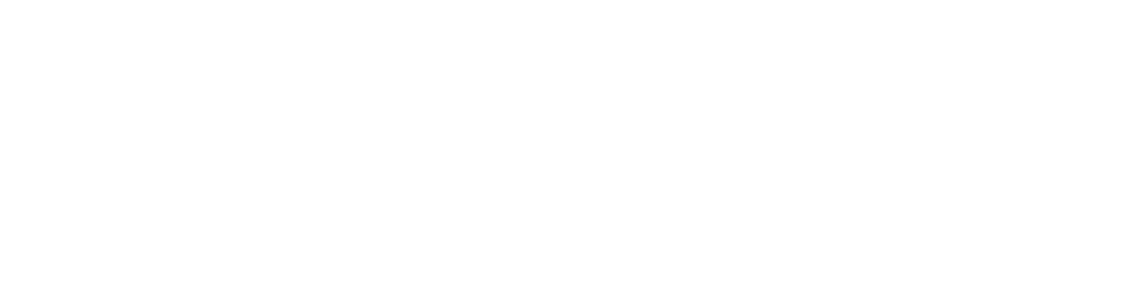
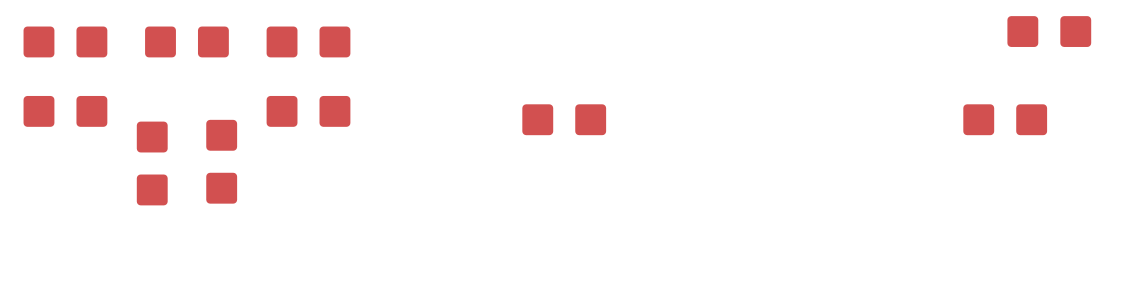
part: none -> (1049, 31)
part: none -> (65, 41)
part: none -> (186, 41)
part: none -> (308, 41)
part: none -> (65, 111)
part: none -> (308, 111)
part: none -> (564, 119)
part: none -> (1005, 119)
part: none -> (221, 161)
part: none -> (152, 163)

